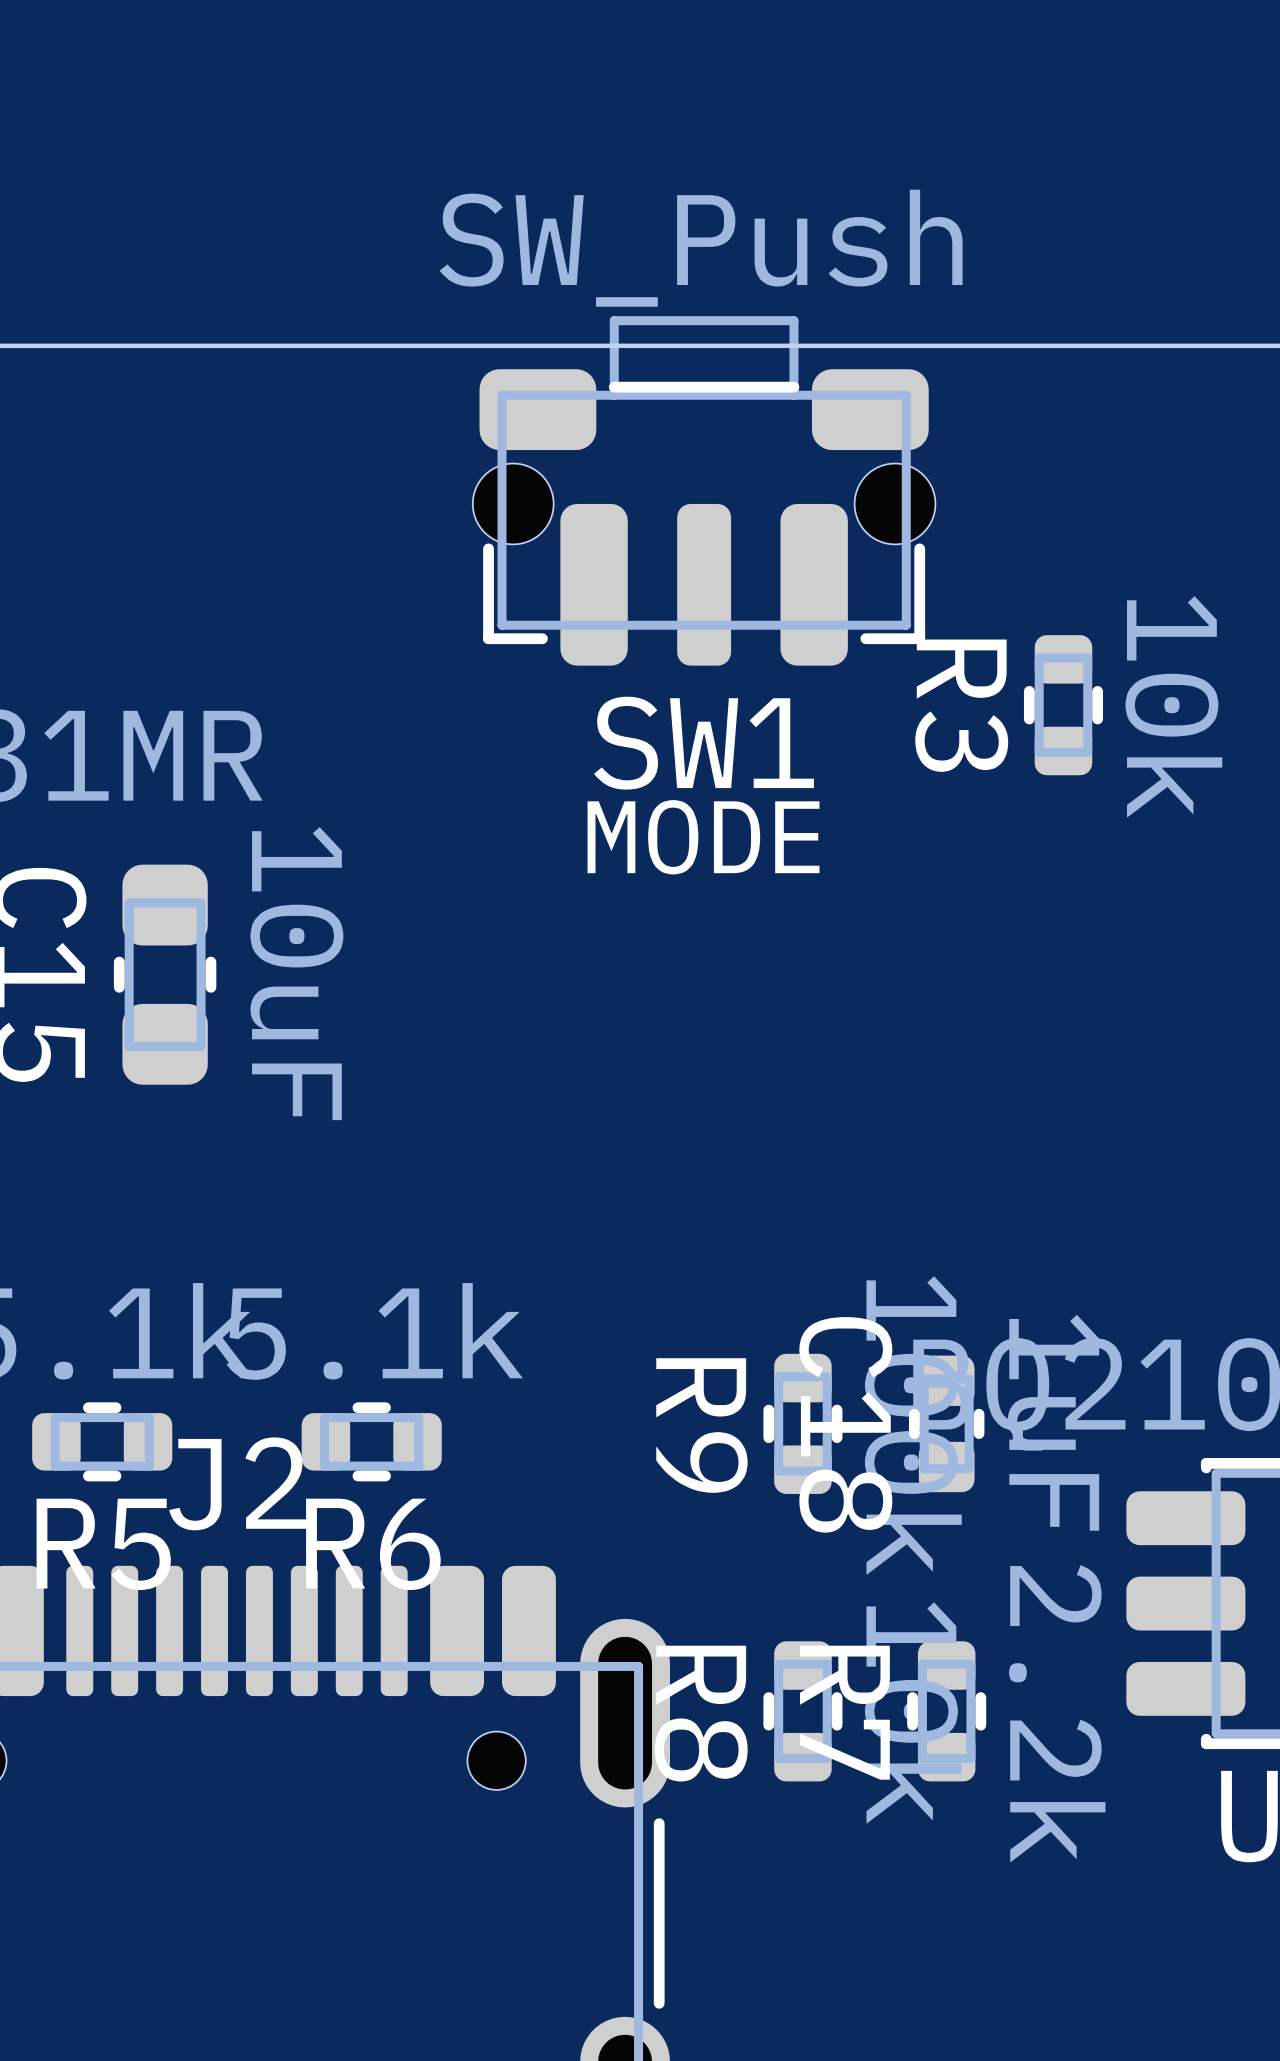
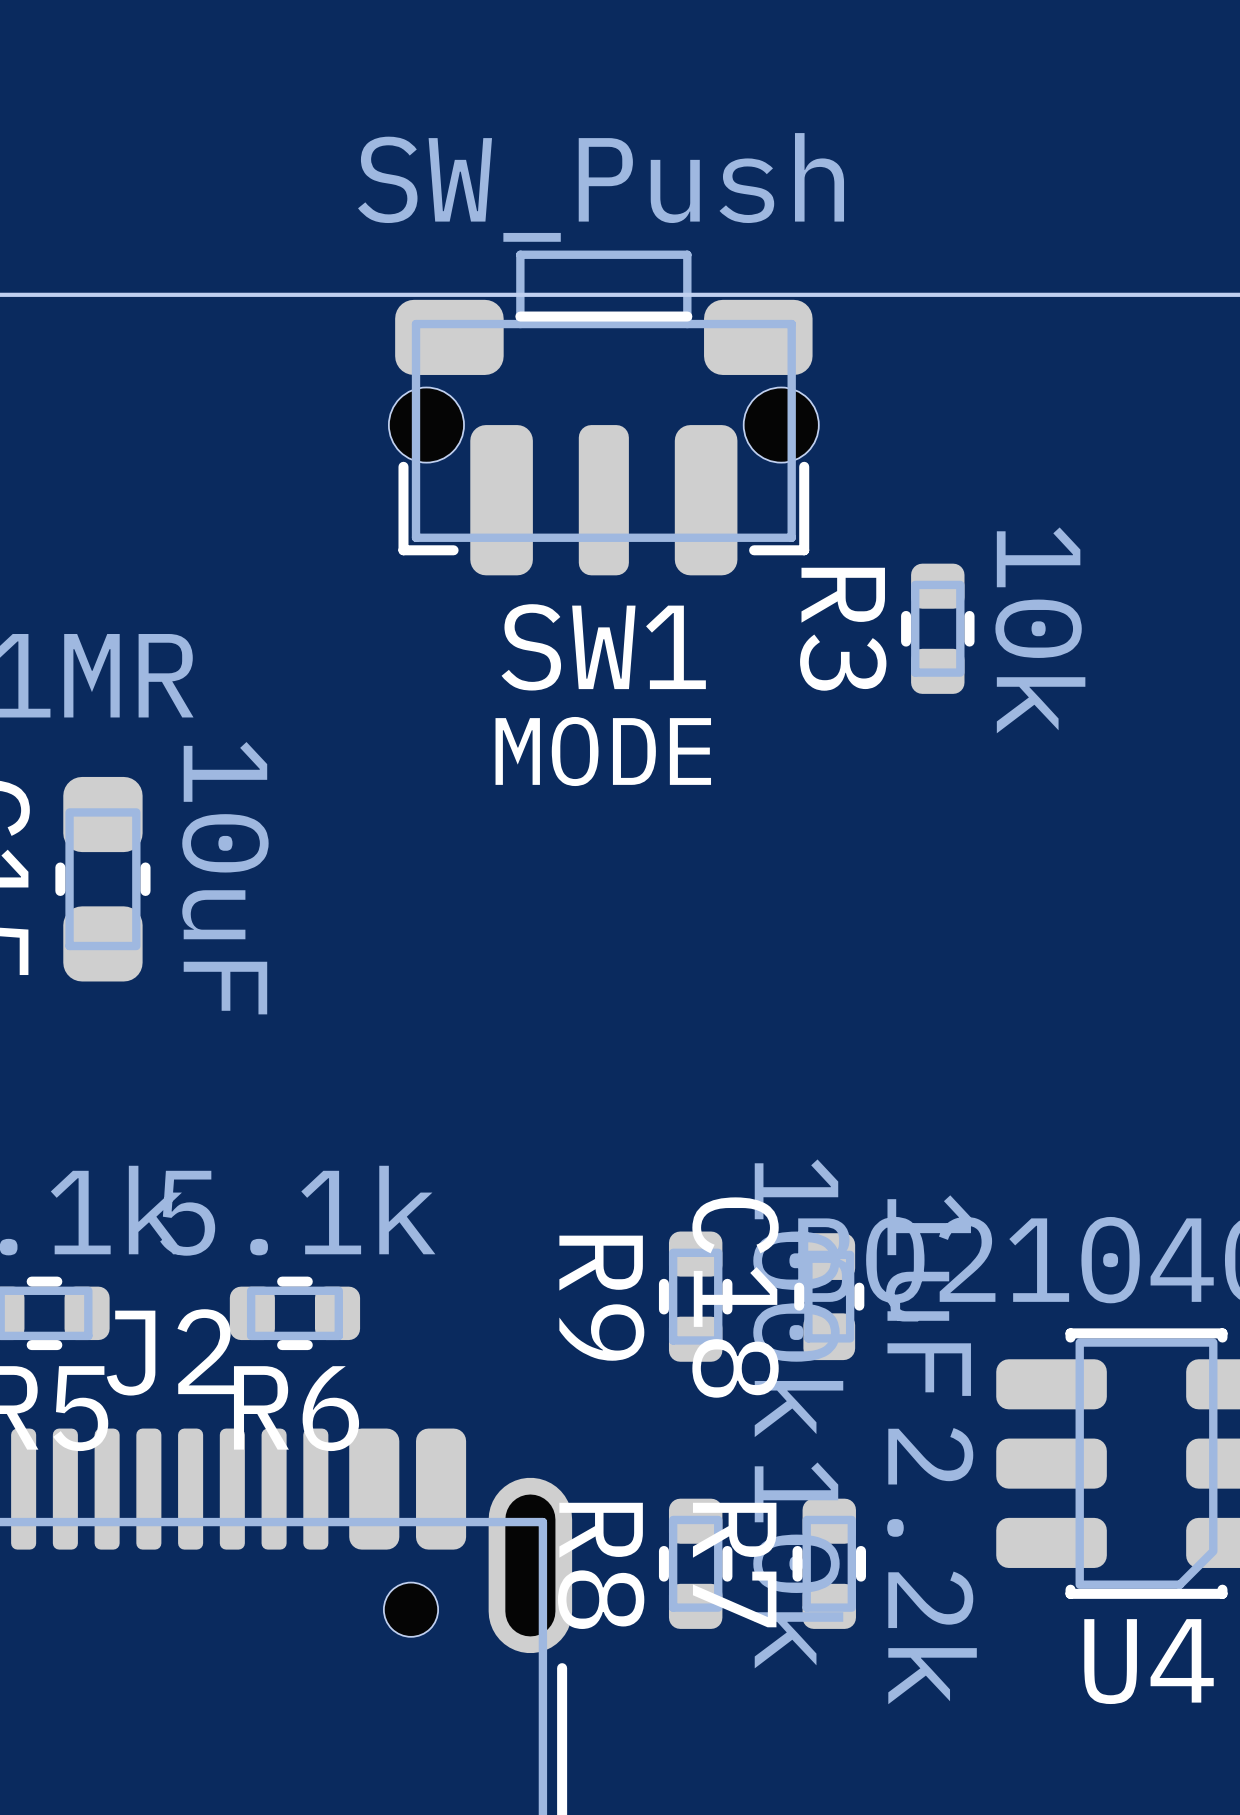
SW1 position: (704, 490) -> (603, 412)

